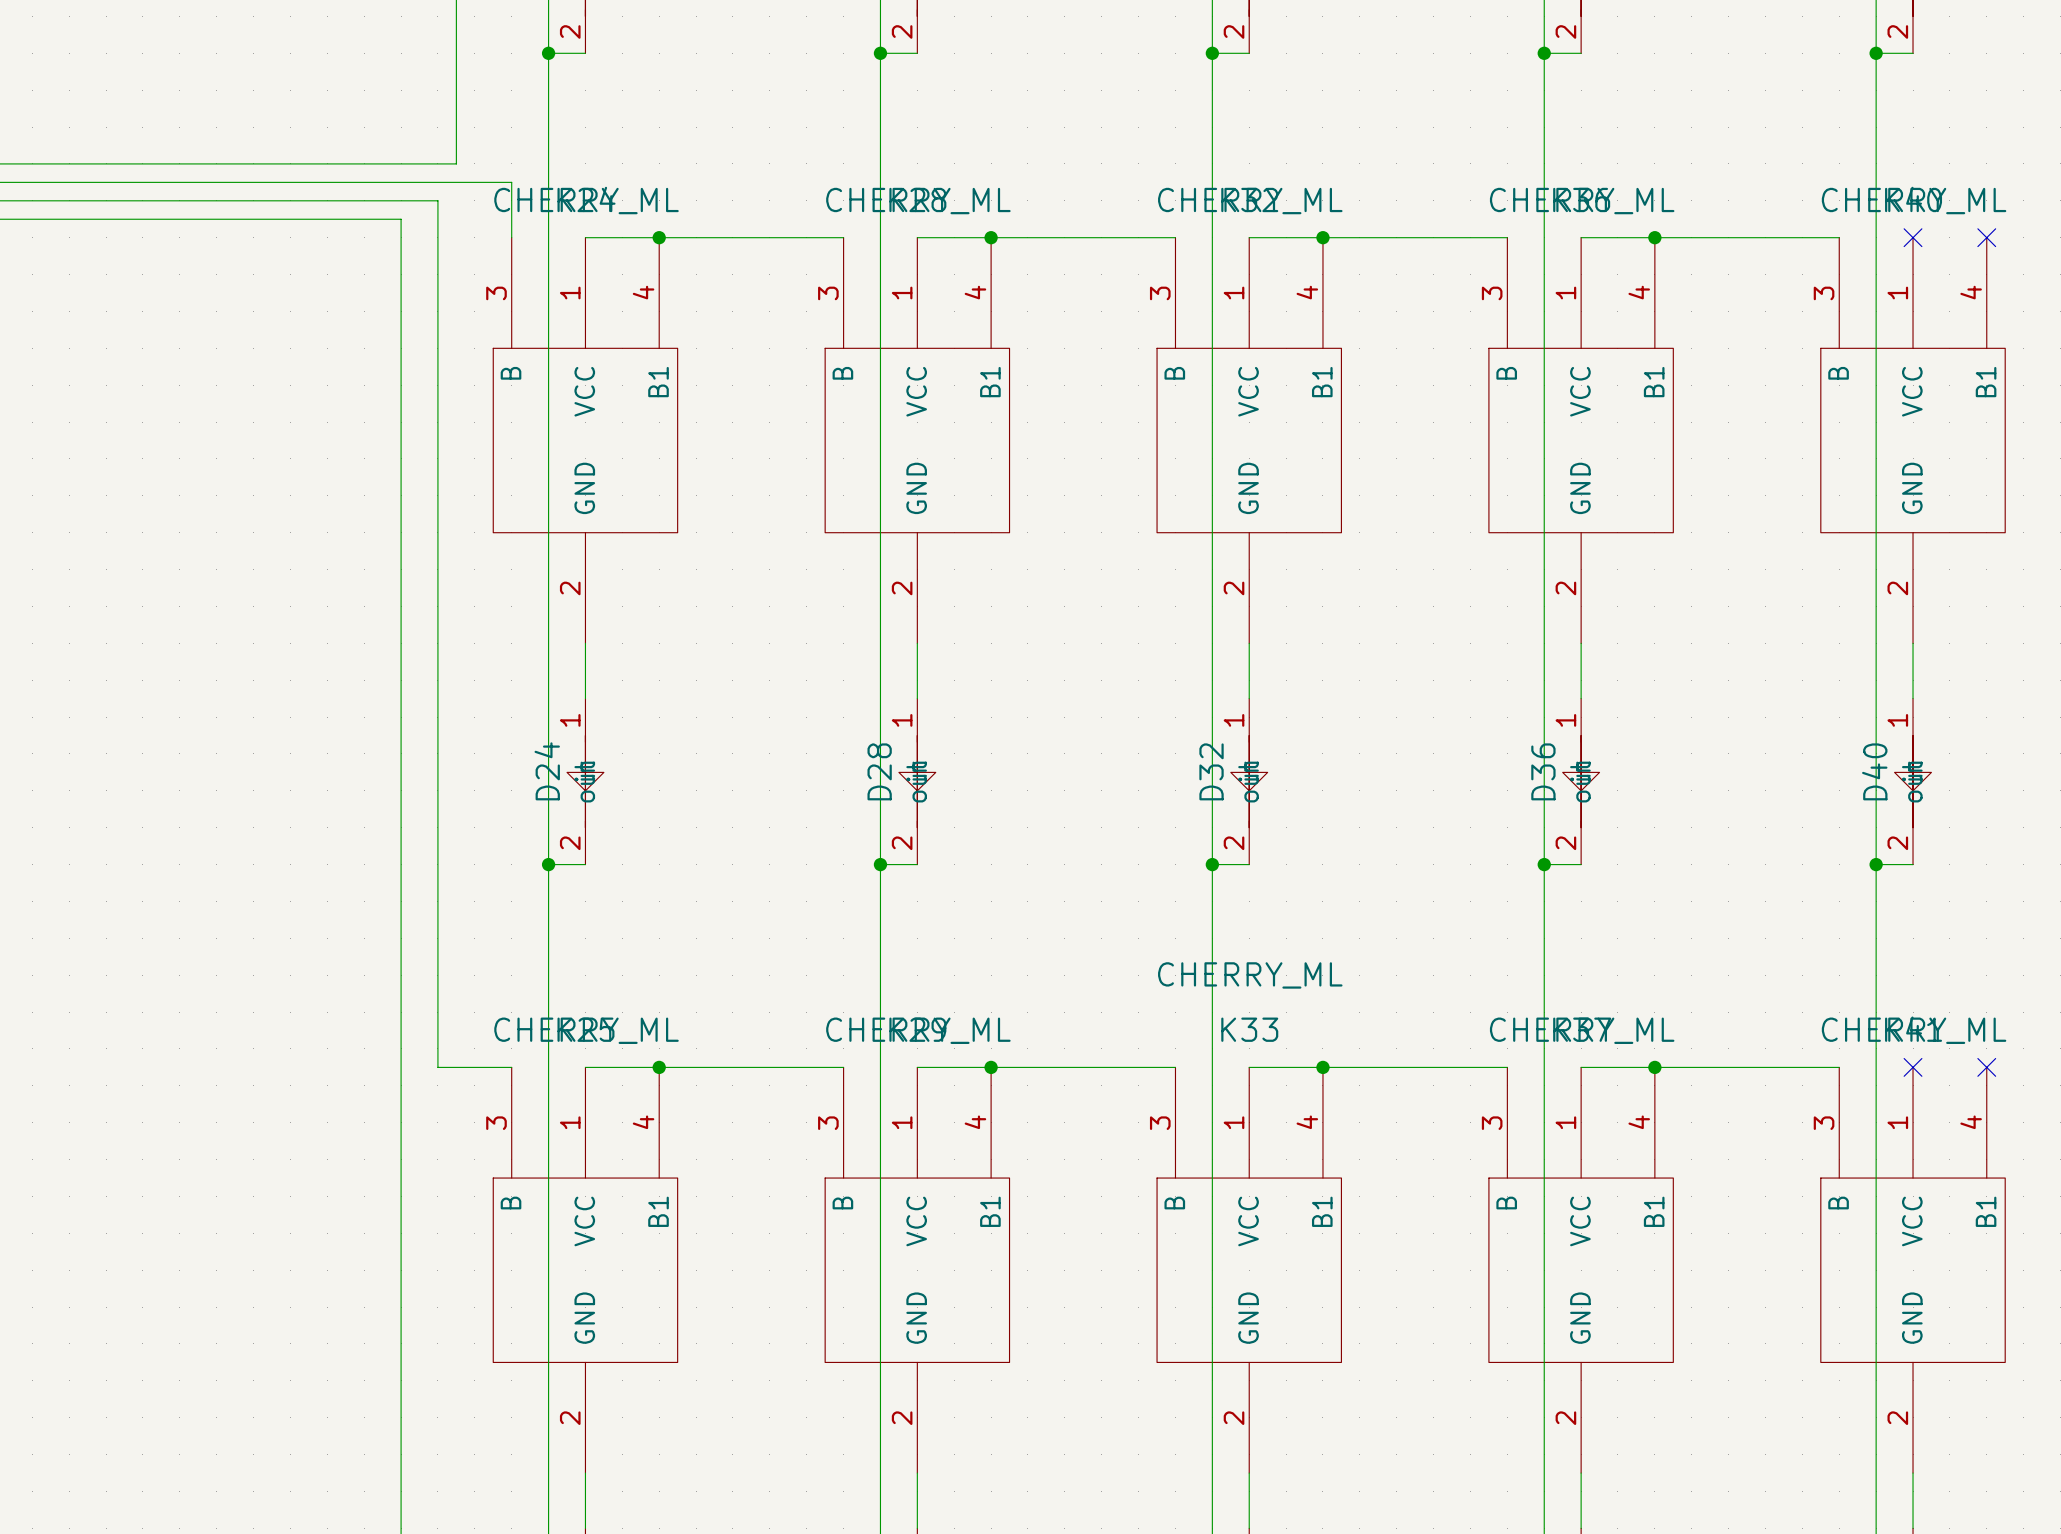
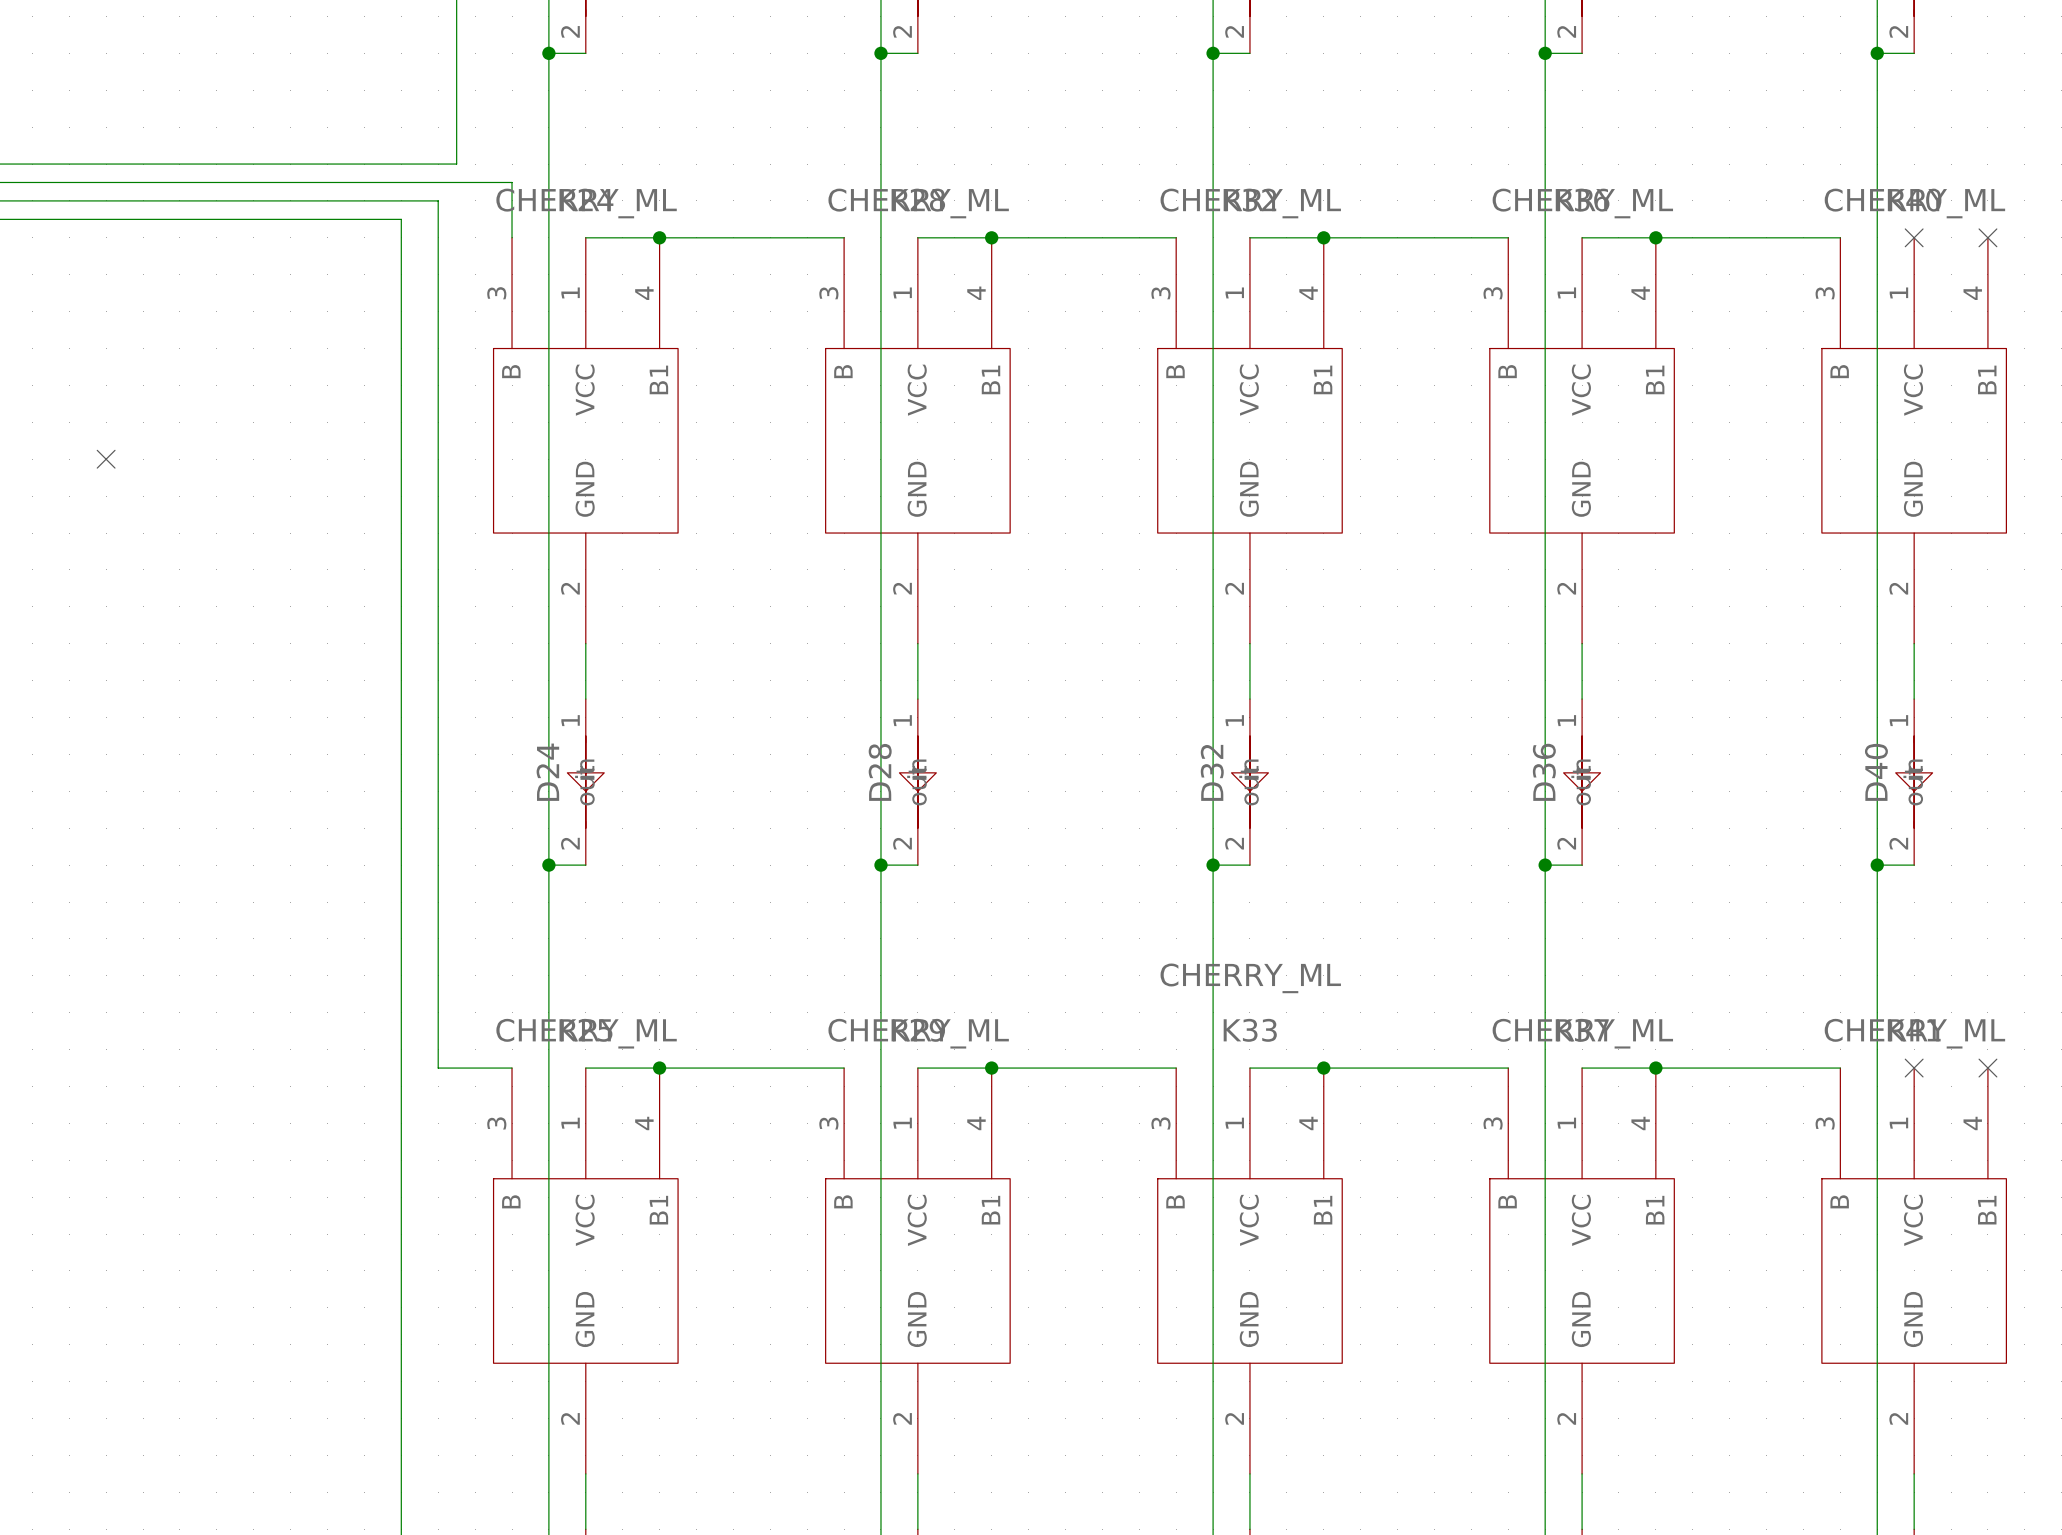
no-connect mark: none -> (106, 459)

